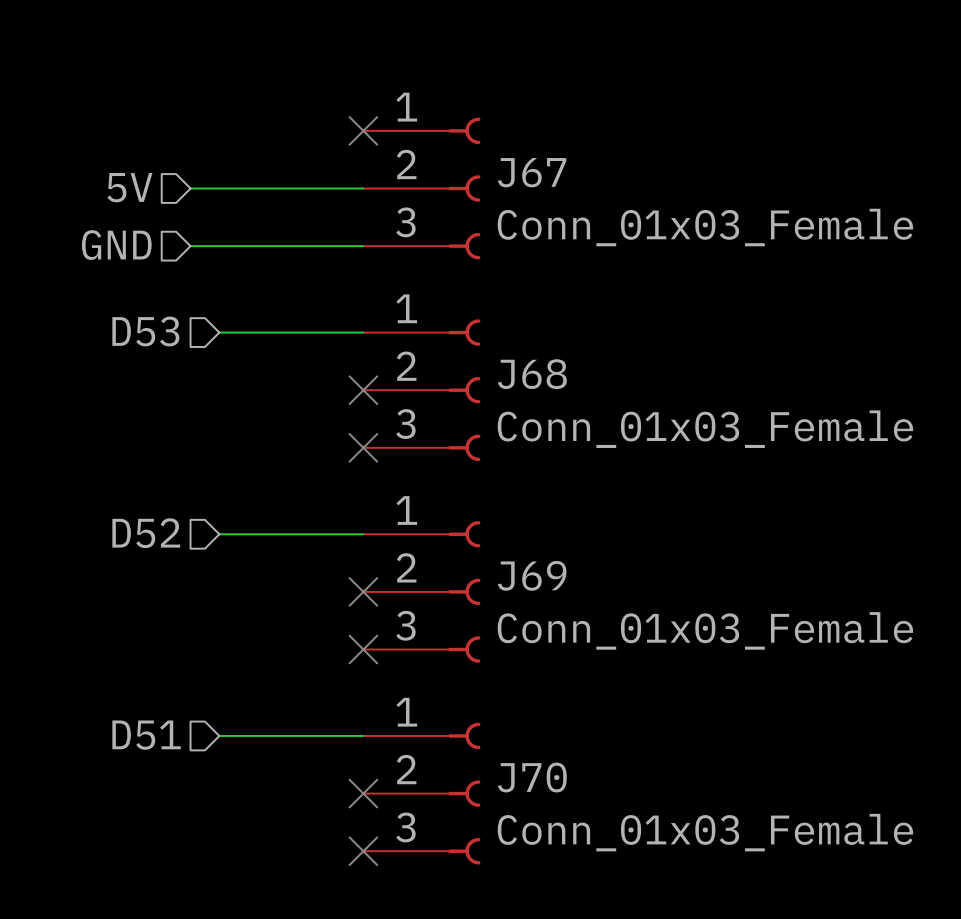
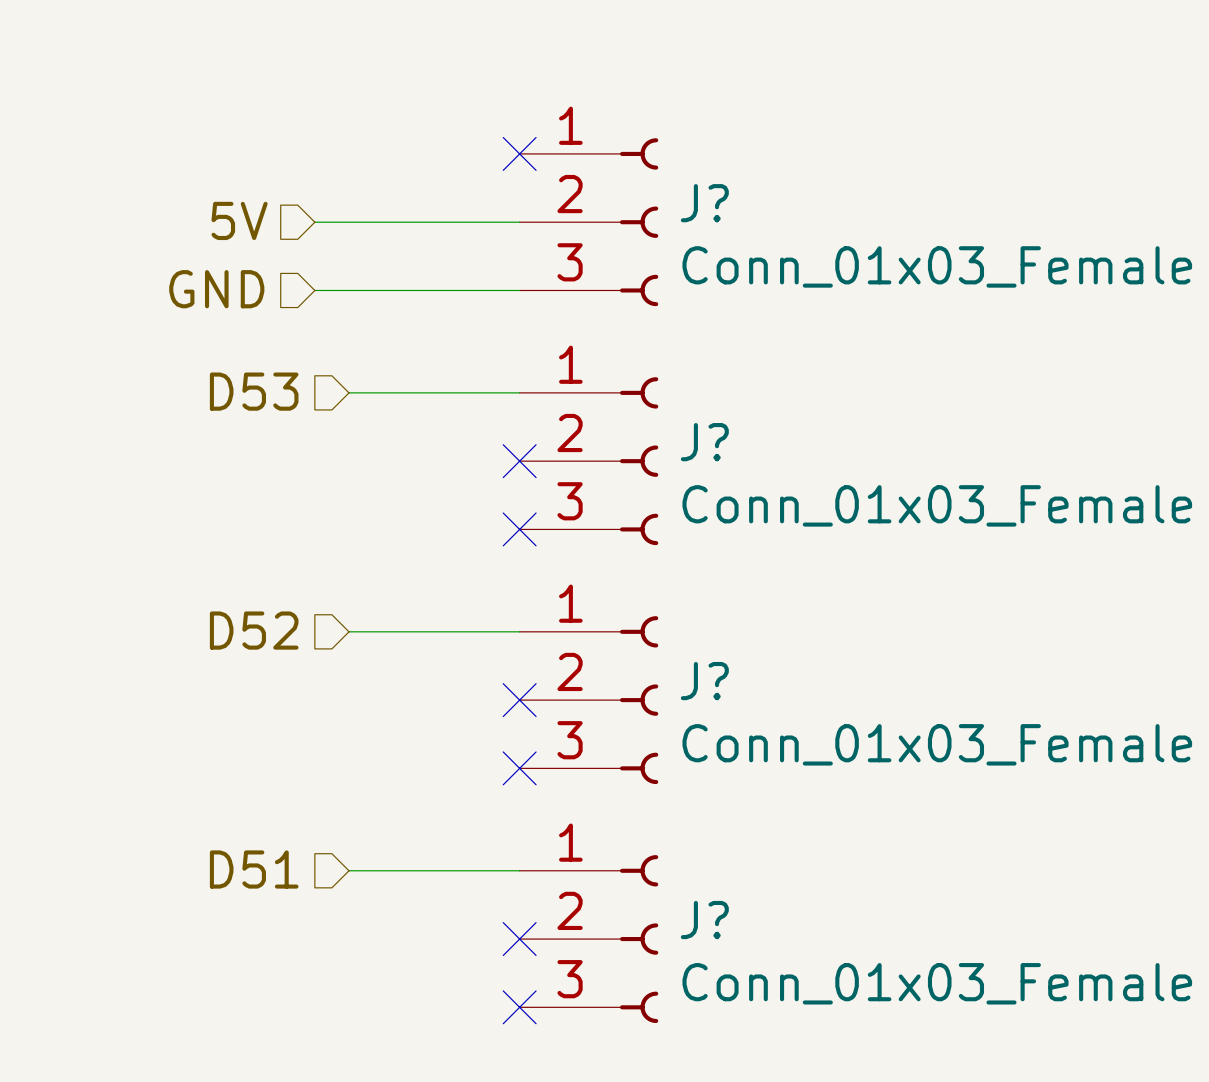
J67 name: J67 (532, 172) -> J? (704, 203)
J68 name: J68 (532, 374) -> J? (704, 442)
J69 name: J69 (532, 575) -> J? (704, 681)
J70 name: J70 (532, 777) -> J? (704, 920)

